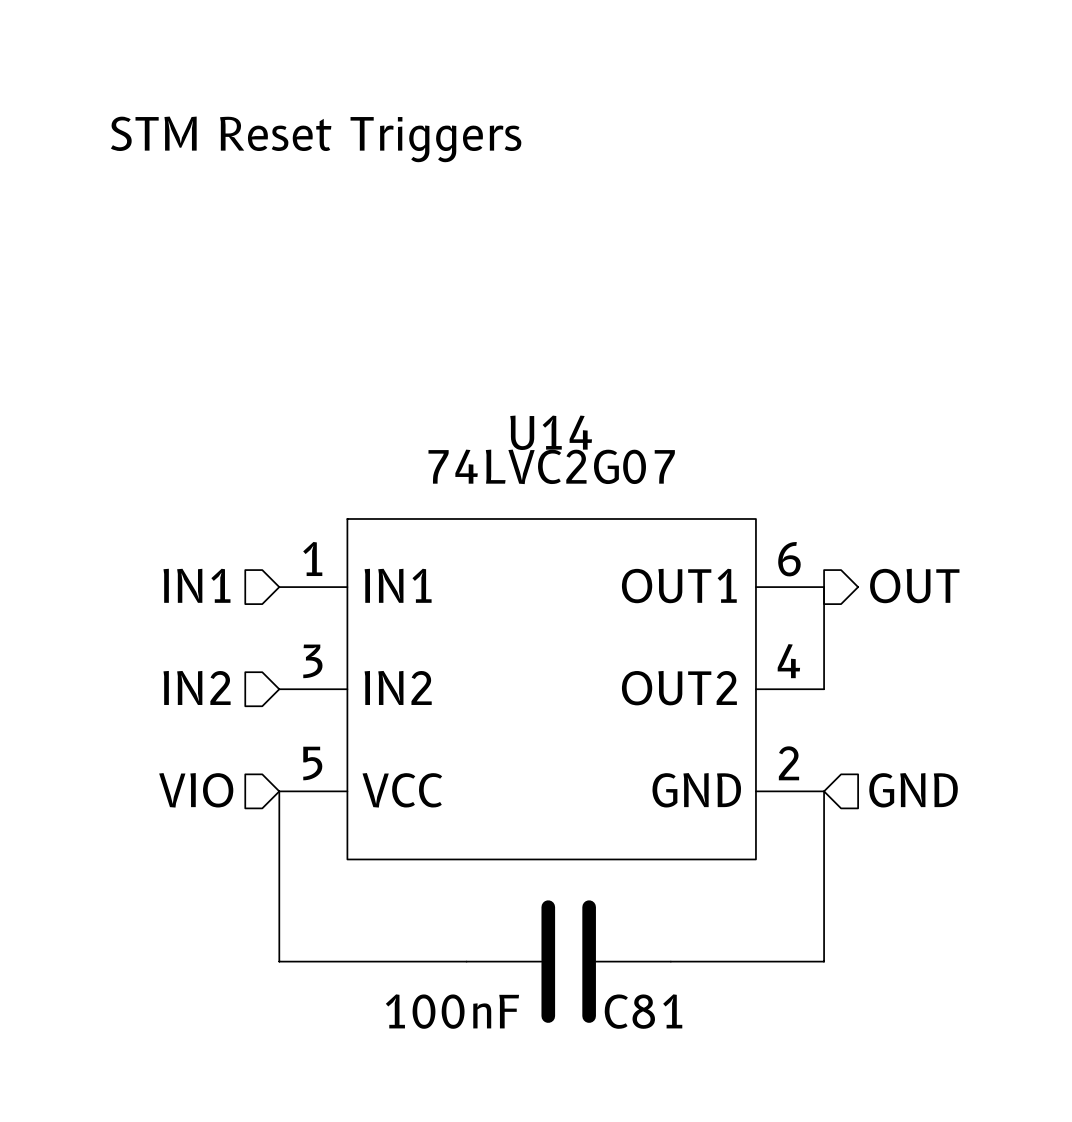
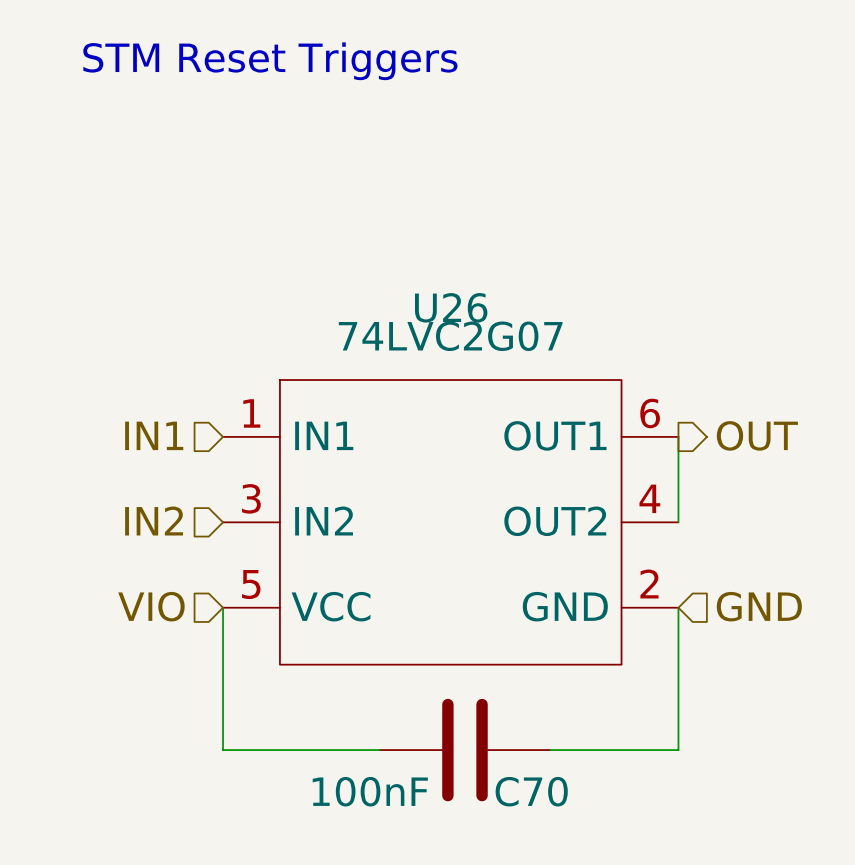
U14 name: U14 (551, 432) -> U26 (451, 307)
C81 name: C81 (643, 1011) -> C70 (531, 791)

